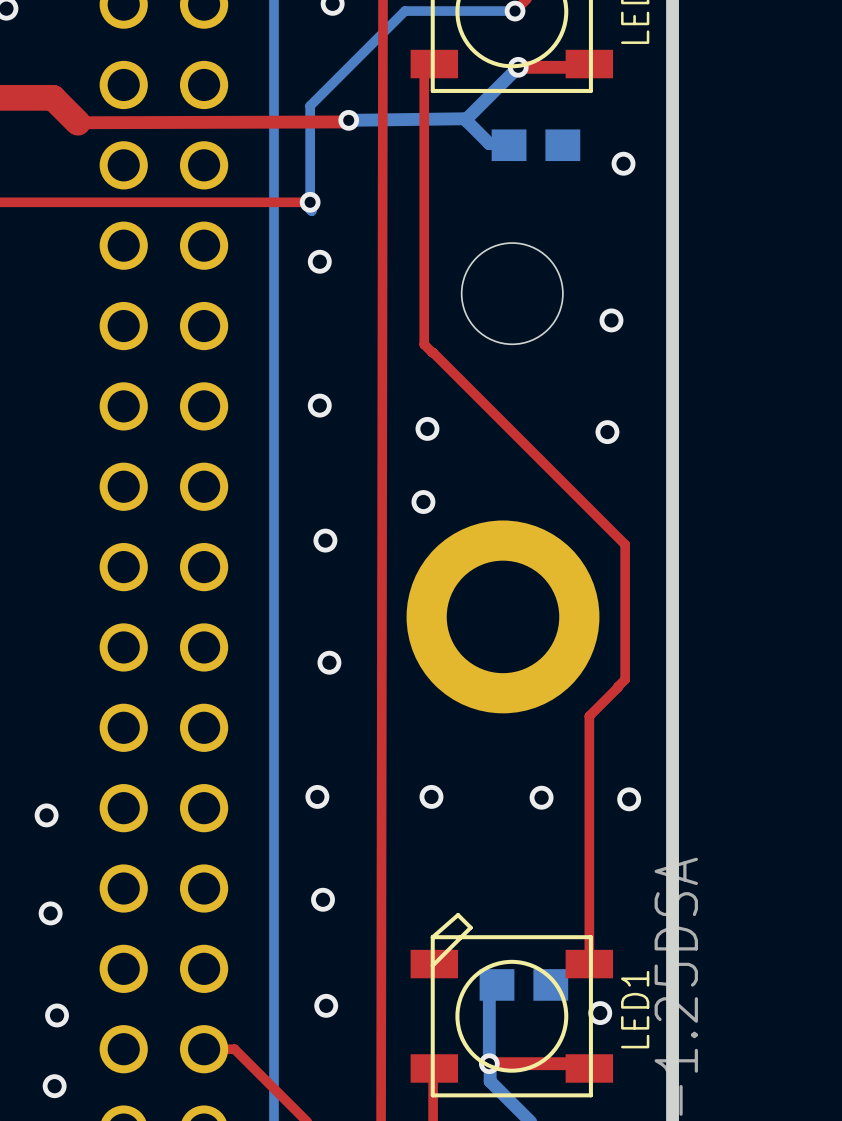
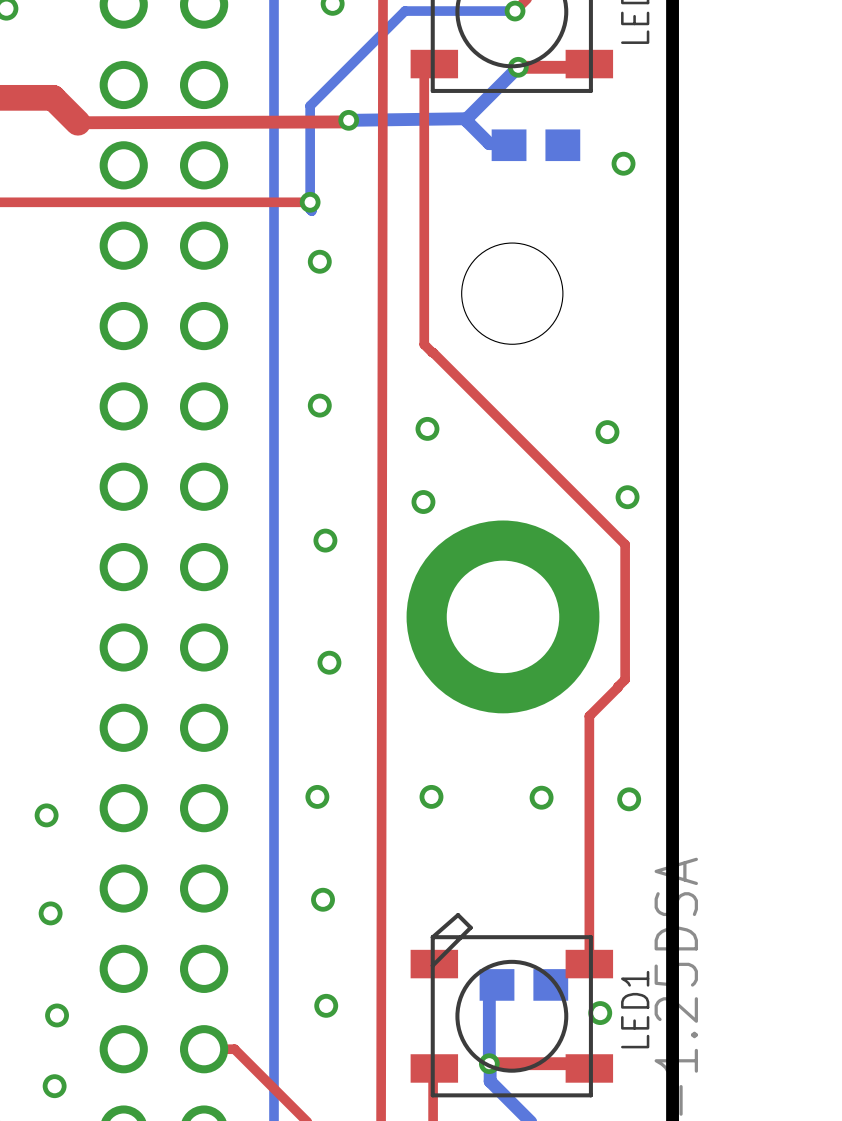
via position: (611, 320) -> (627, 497)

